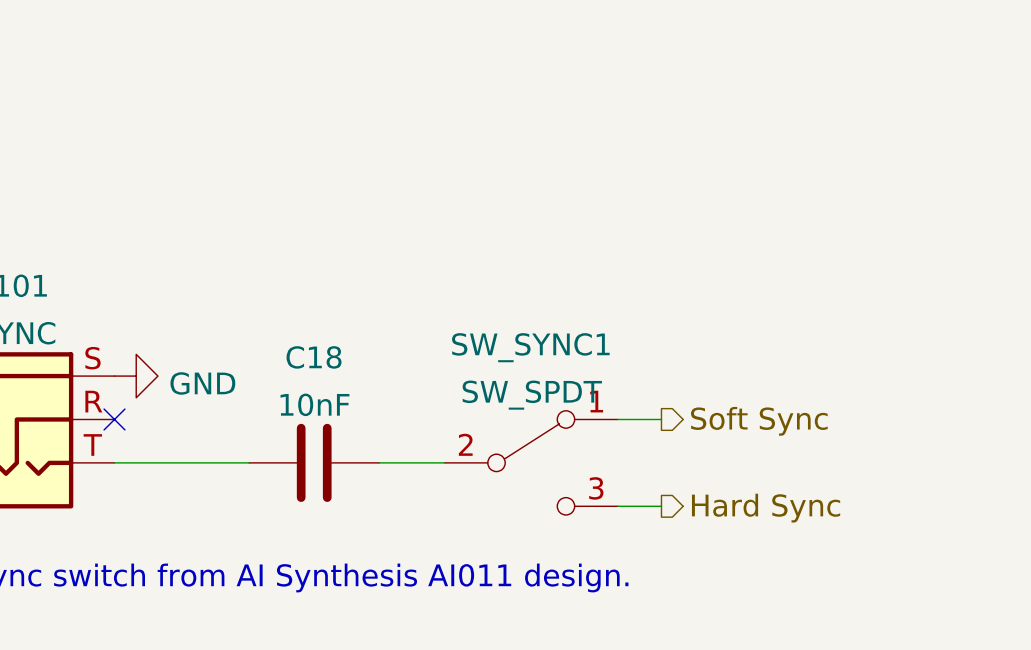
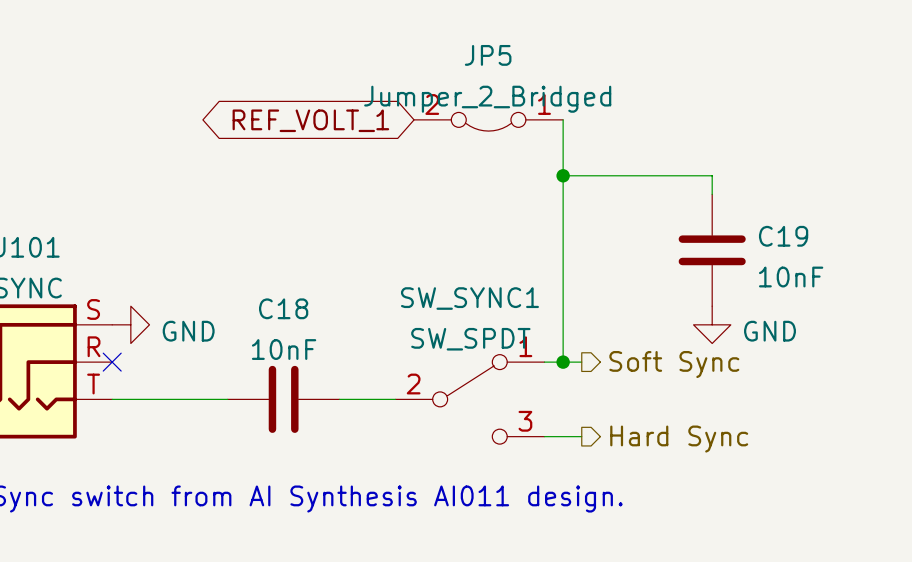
wire: none -> (563, 119) (563, 362)
JP5: none -> Jumper_2_Bridged (488, 121)
global label: none -> REF_VOLT_1 (310, 120)
wire: none -> (563, 175) (712, 175) (712, 194)
junction: none -> (563, 175)
C19: none -> 10nF (712, 250)
power symbol: none -> GND (712, 324)
junction: none -> (563, 362)

